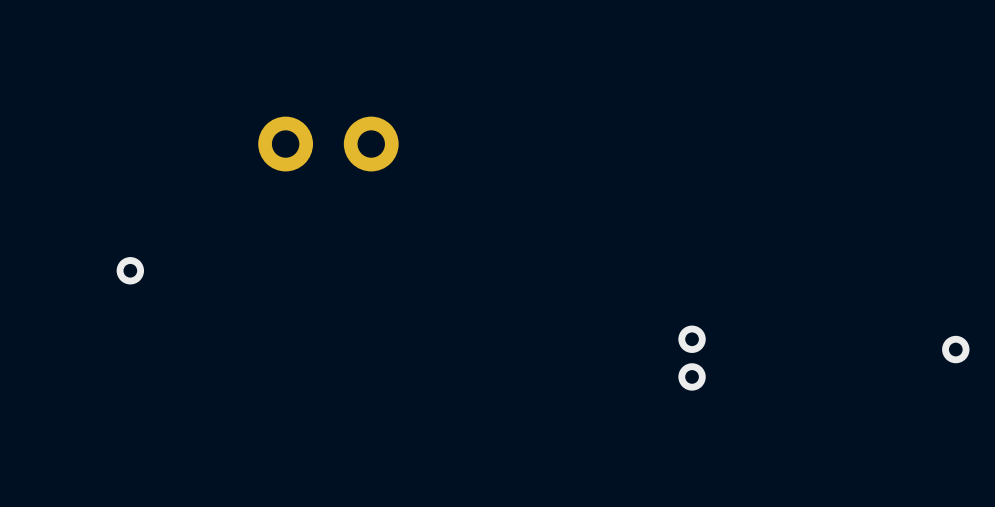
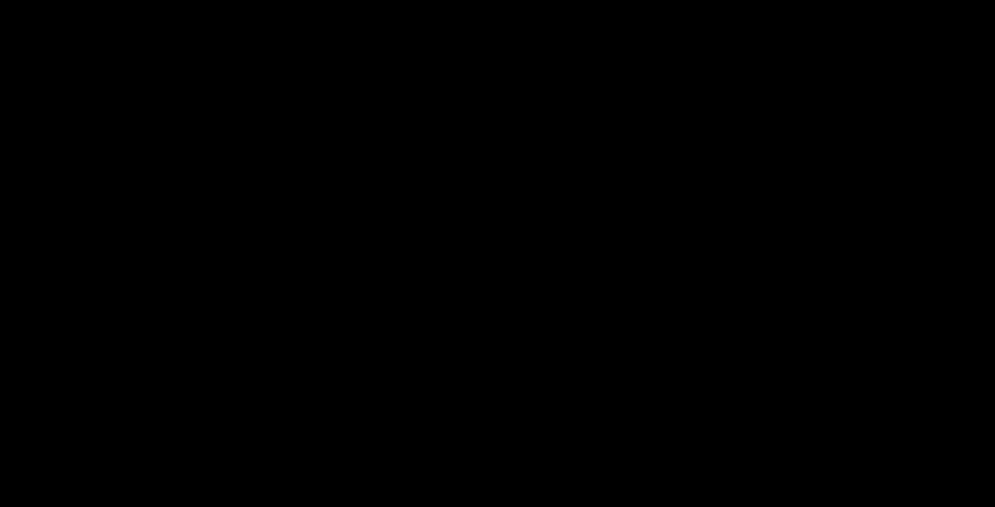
part: (328, 144) -> none
via: (130, 270) -> none
via: (692, 339) -> none
via: (955, 349) -> none
via: (692, 376) -> none

